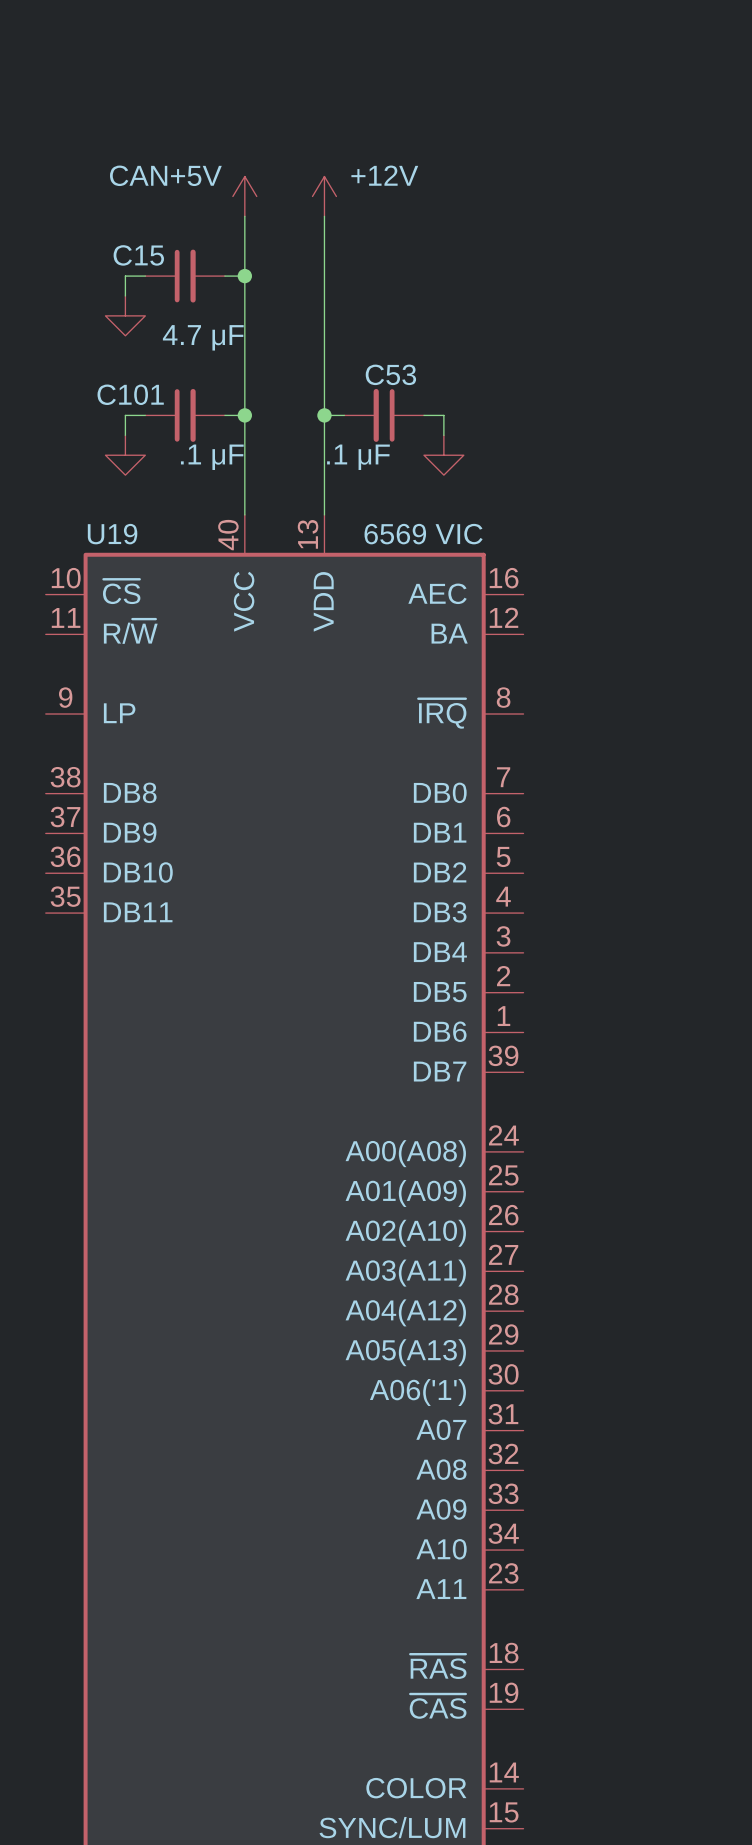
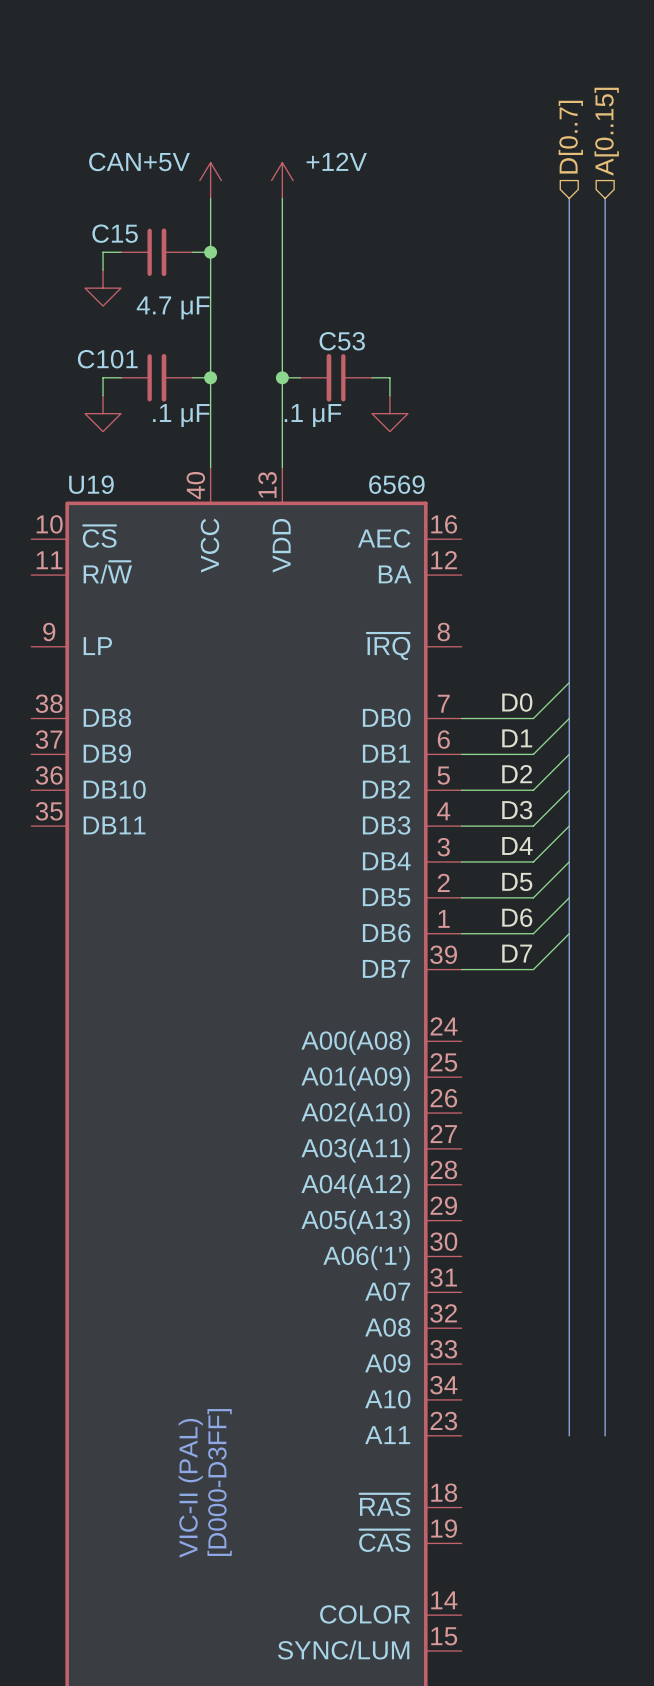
hierarchical label: none -> A[0..15] (606, 131)
hierarchical label: none -> D[0..7] (570, 137)
bus: none -> (569, 198) (569, 1435)
bus: none -> (605, 198) (605, 1435)
U19 value: 6569 VIC (423, 534) -> 6569 (396, 484)
wire: none -> (569, 682) (533, 718) (461, 718)
label: none -> D0 (517, 702)
wire: none -> (569, 718) (533, 754) (461, 754)
label: none -> D1 (517, 738)
wire: none -> (569, 754) (533, 790) (461, 790)
label: none -> D2 (517, 774)
wire: none -> (569, 790) (533, 826) (461, 826)
label: none -> D3 (517, 810)
wire: none -> (569, 826) (533, 861) (461, 861)
label: none -> D4 (517, 845)
wire: none -> (569, 861) (533, 897) (461, 897)
label: none -> D5 (517, 881)
wire: none -> (569, 897) (533, 933) (461, 933)
label: none -> D6 (517, 917)
wire: none -> (569, 933) (533, 969) (461, 969)
label: none -> D7 (517, 953)
text: none -> [D000-D3FF] (219, 1482)
text: none -> VIC-II (PAL) (190, 1488)

